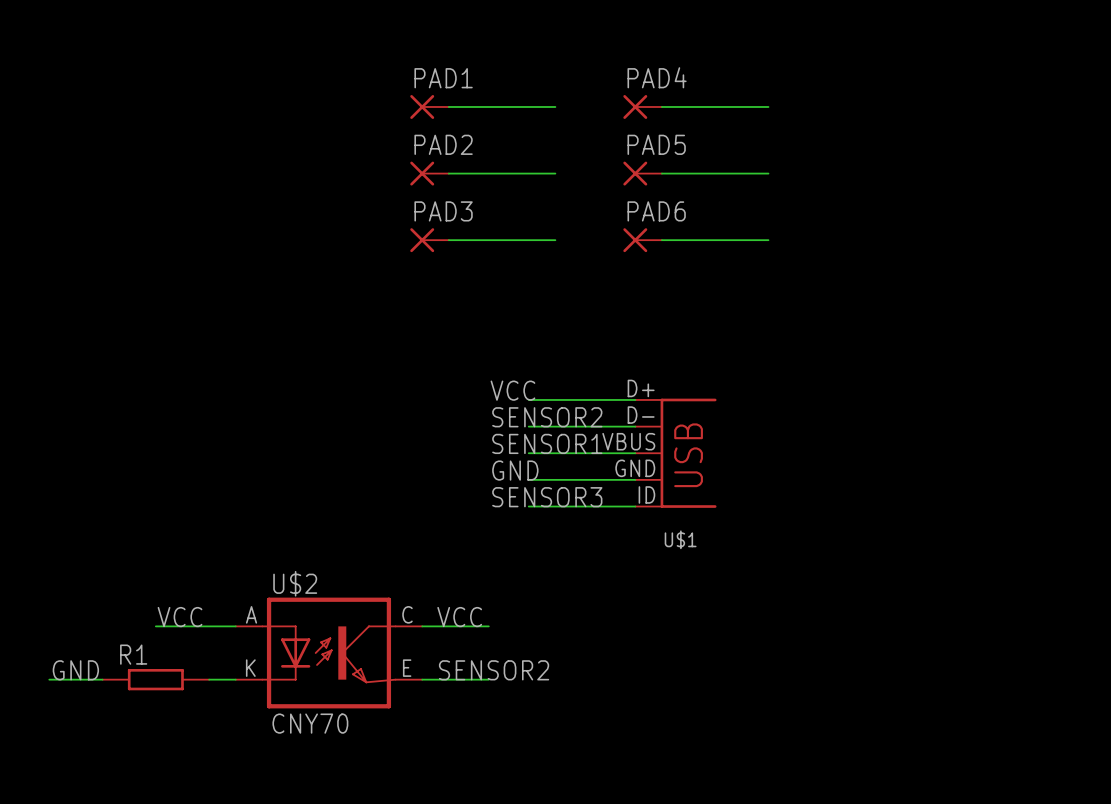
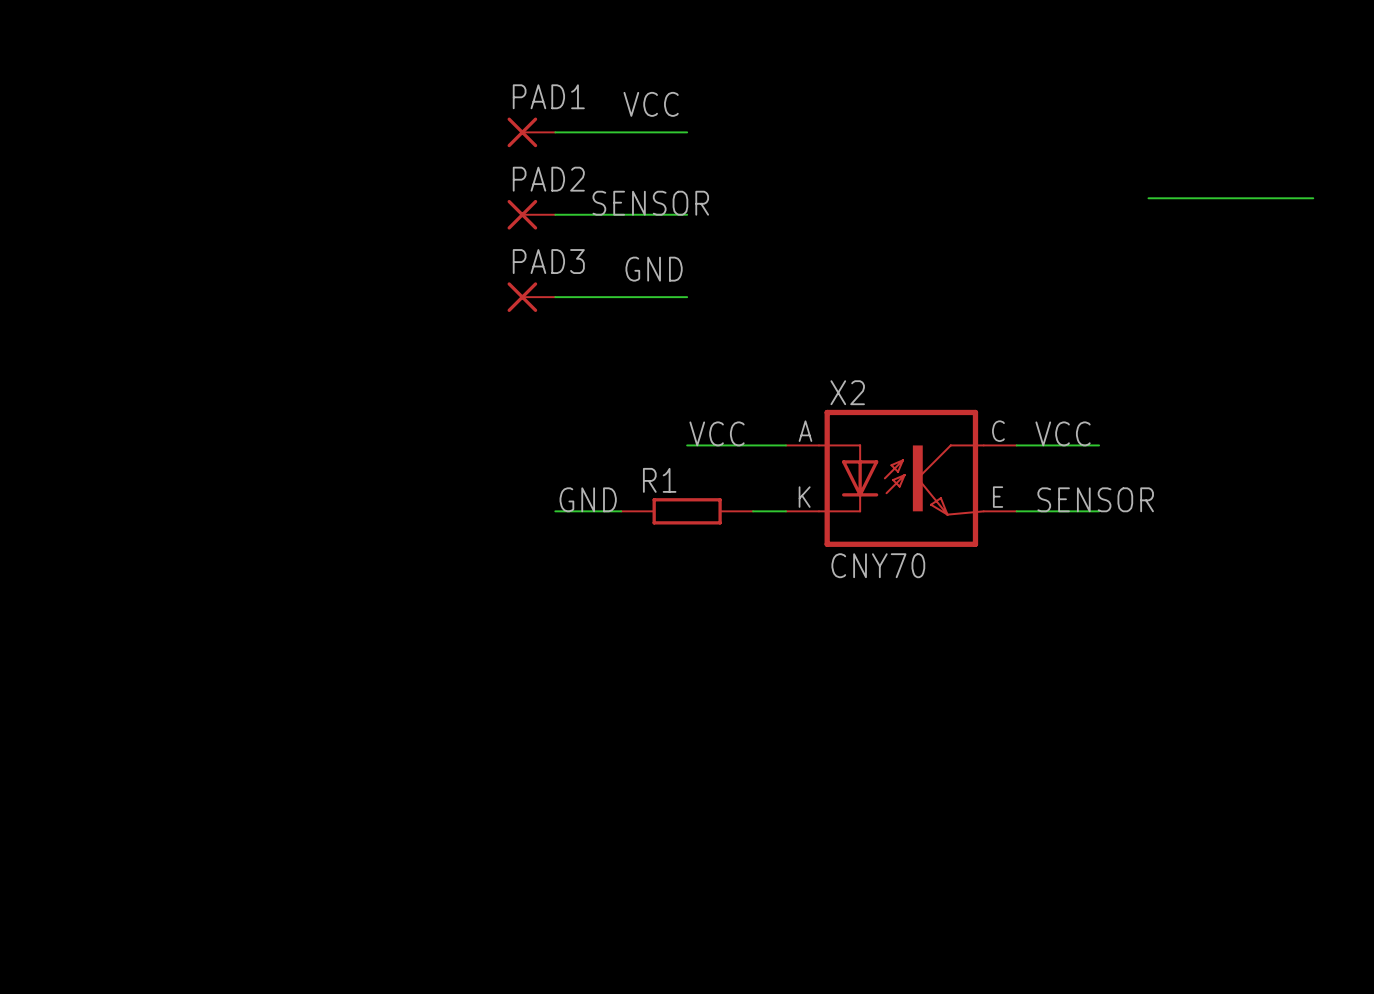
label: none -> VCC (651, 104)
PAD4: (642, 106) -> none
wire: (661, 106) (768, 106) -> none
wire: none -> (1148, 198) (1313, 198)
label: none -> SENSOR (650, 203)
PAD5: (642, 173) -> none
wire: (661, 173) (768, 173) -> none
label: none -> GND (654, 269)
PAD6: (642, 240) -> none
wire: (661, 240) (768, 240) -> none
label: none -> VCC (1063, 433)
wire: none -> (687, 445) (786, 445)
wire: none -> (1016, 445) (1099, 445)
X2: none -> CNY70 (901, 478)
label position: VCC (512, 390) -> VCC (717, 433)
wire: (528, 399) (635, 399) -> none
label: none -> SENSOR (1095, 499)
wire: none -> (555, 511) (621, 511)
wire: none -> (753, 511) (786, 511)
wire: none -> (1016, 511) (1099, 511)
label: SENSOR2 (547, 417) -> none
wire: (528, 426) (635, 426) -> none
label: SENSOR1 (547, 443) -> none
wire: (528, 453) (635, 453) -> none
U$1: (675, 453) -> none
label position: GND (515, 470) -> GND (588, 499)
wire: (528, 479) (635, 479) -> none
label: SENSOR3 (547, 497) -> none
wire: (528, 506) (635, 506) -> none
label: VCC (180, 617) -> none
label: VCC (459, 617) -> none
wire: (155, 626) (235, 626) -> none
wire: (422, 626) (488, 626) -> none
U$2: CNY70 (328, 653) -> none
label: GND (75, 670) -> none
label: SENSOR2 (494, 670) -> none
wire: (49, 679) (102, 679) -> none
R1 position: (155, 679) -> (687, 511)
wire: (209, 679) (235, 679) -> none
wire: (422, 679) (488, 679) -> none

